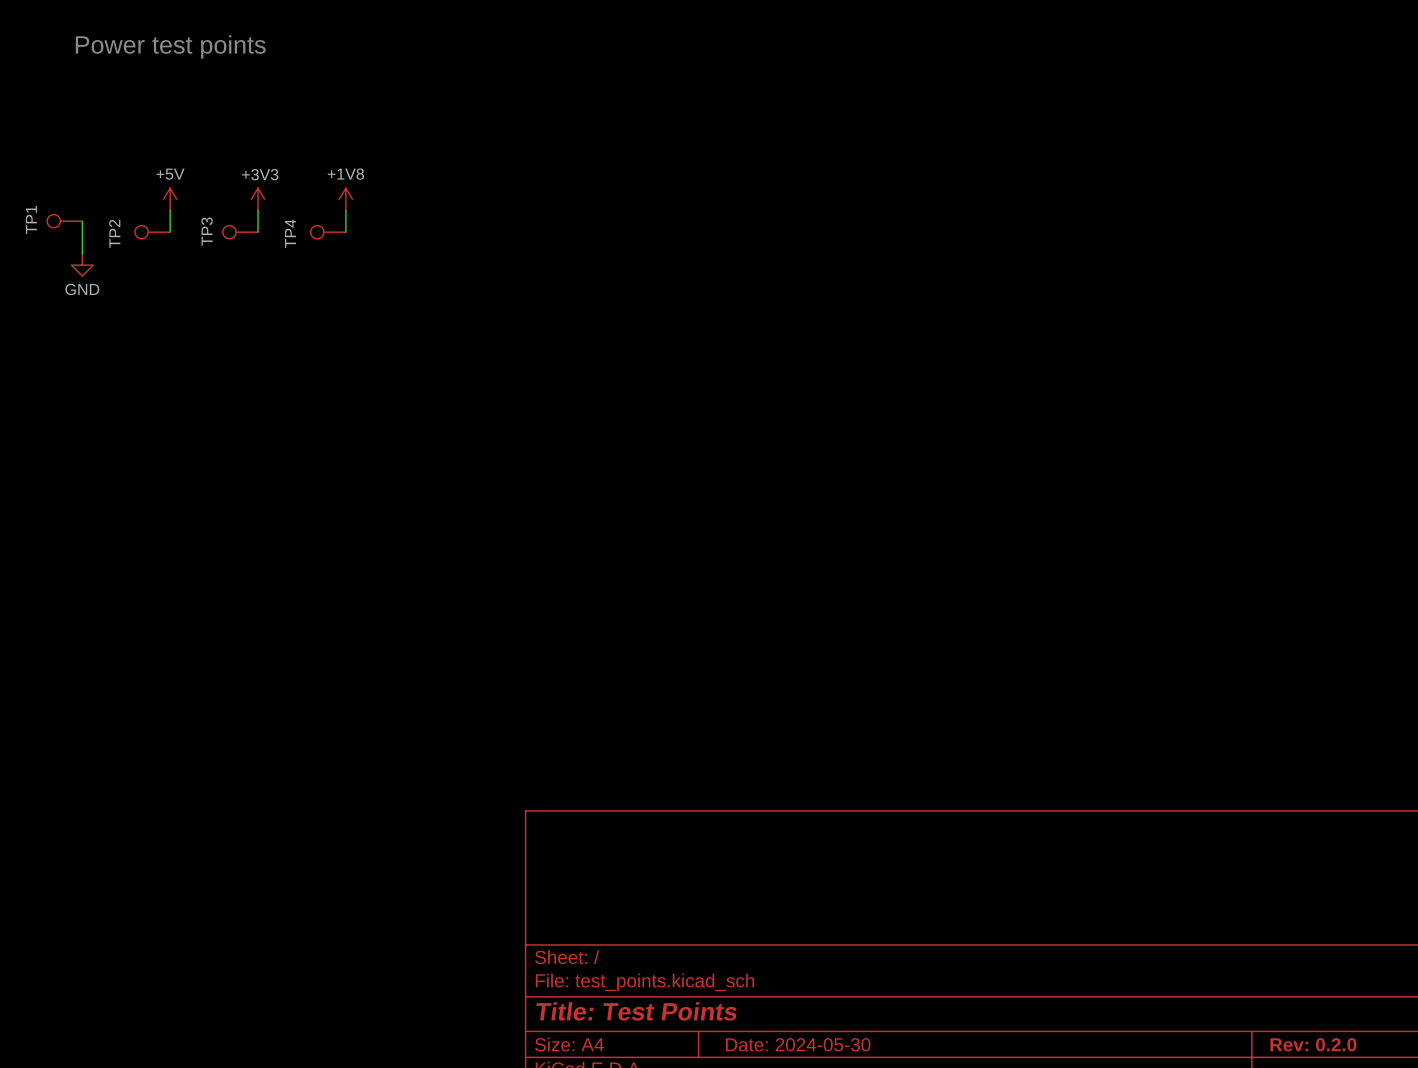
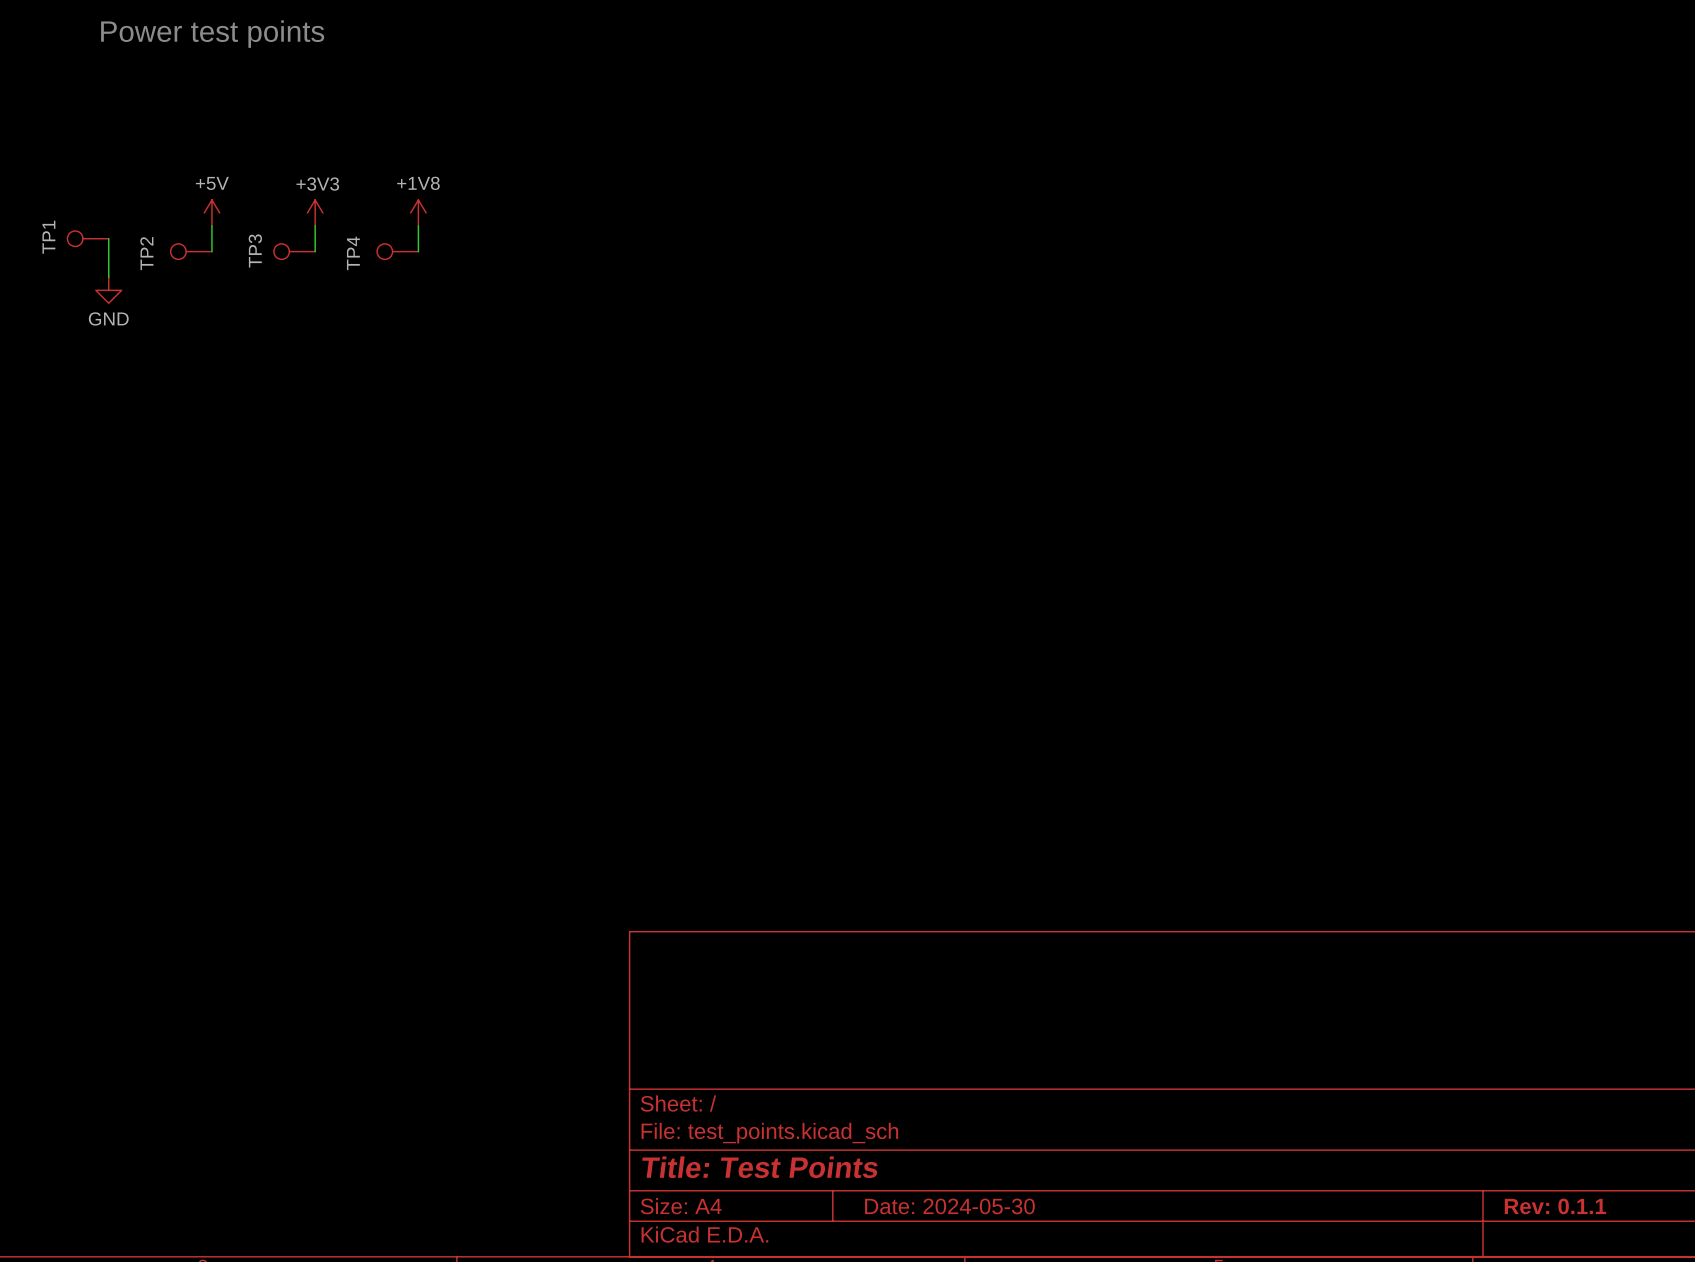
title block: Rev: 0.2.0 (1313, 1044) -> Rev: 0.1.1 (1555, 1206)

